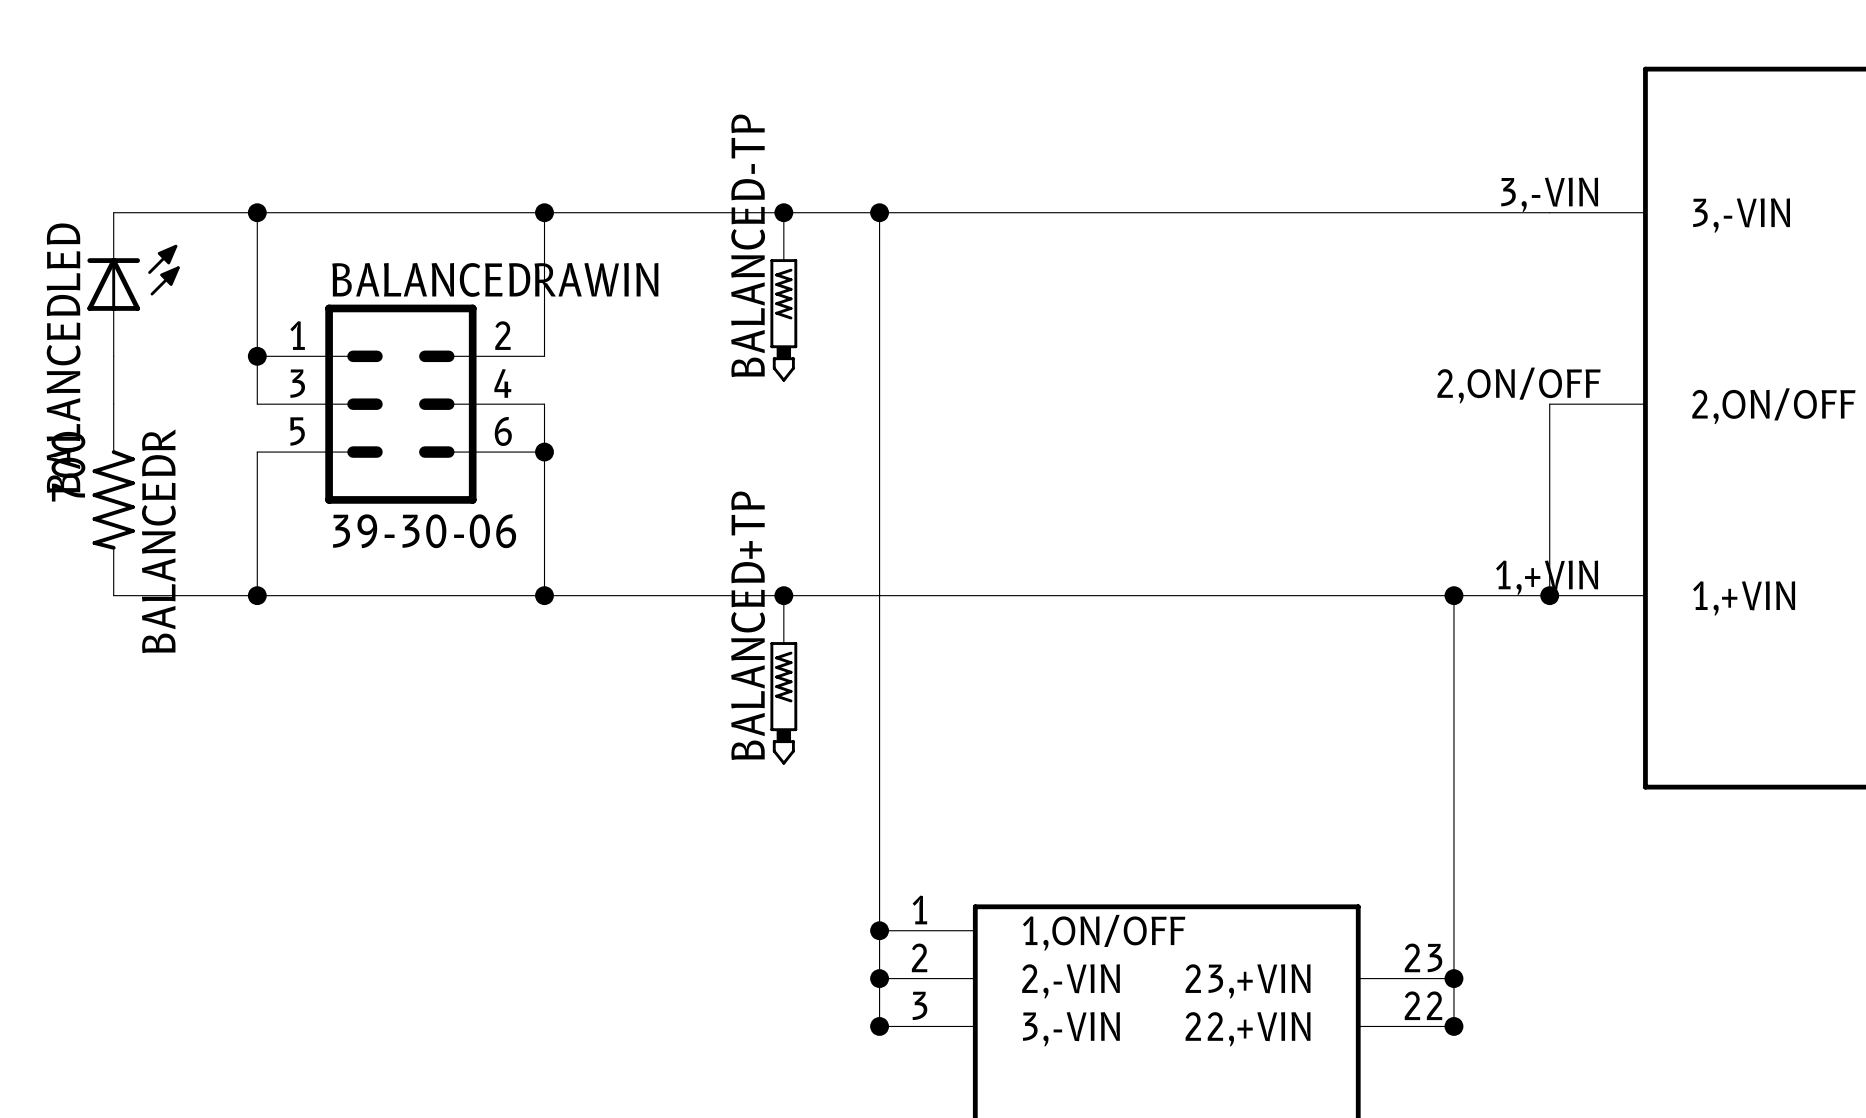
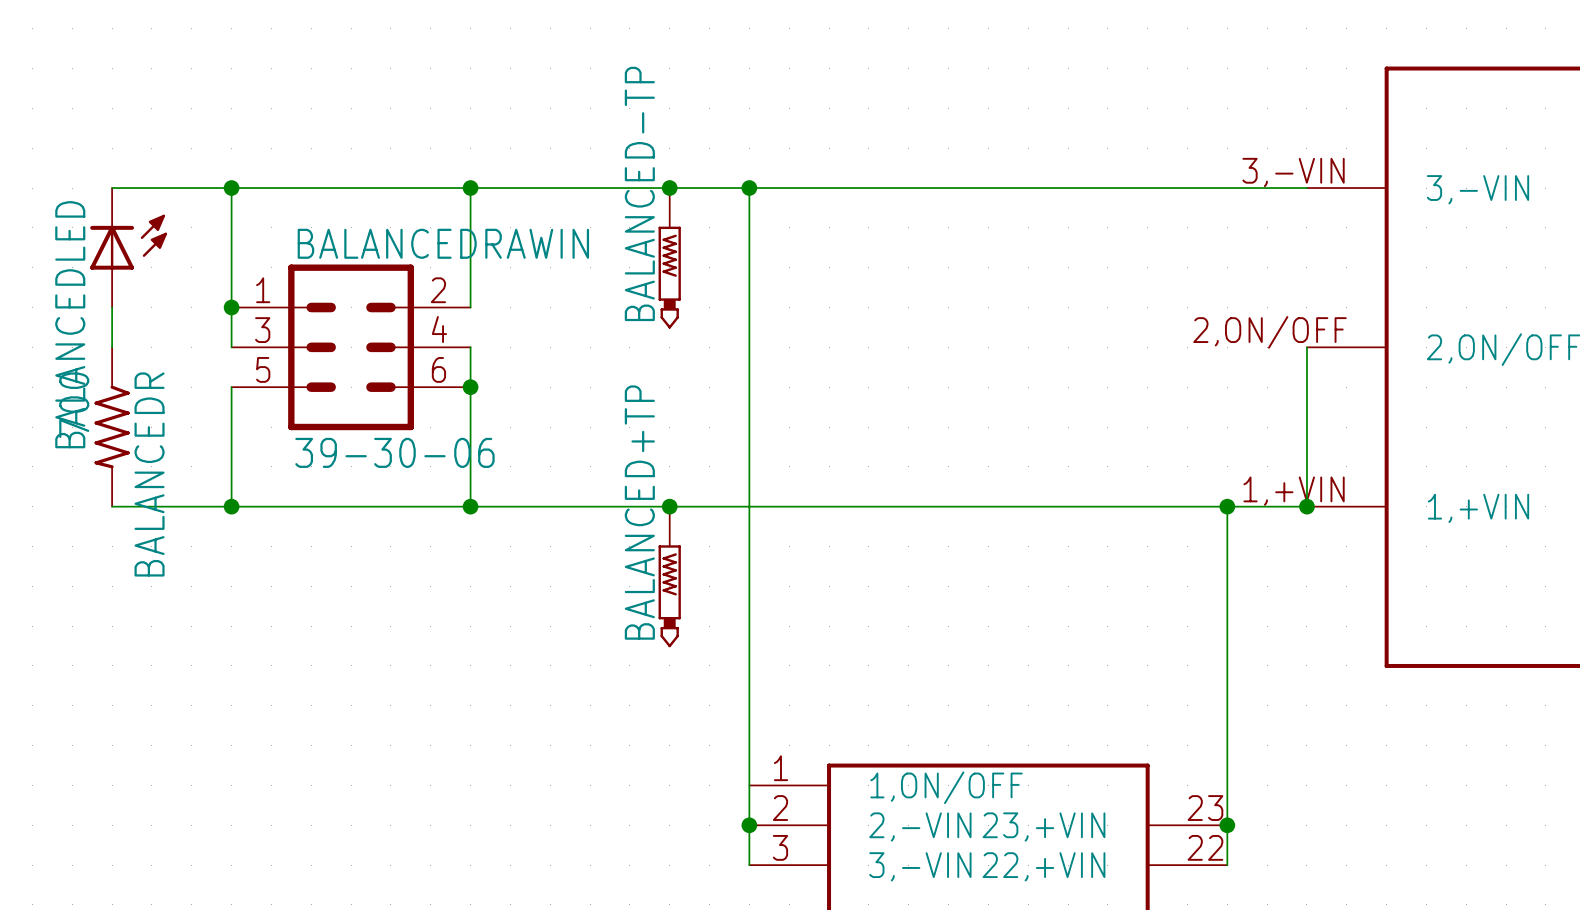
junction: (879, 930) -> none
junction: (879, 1026) -> none
junction: (1453, 1026) -> none

